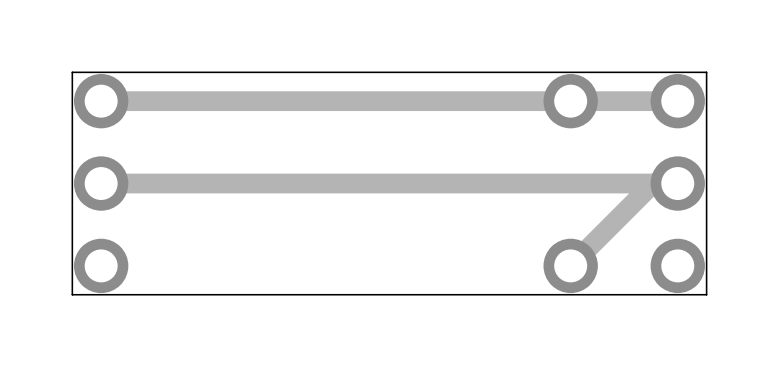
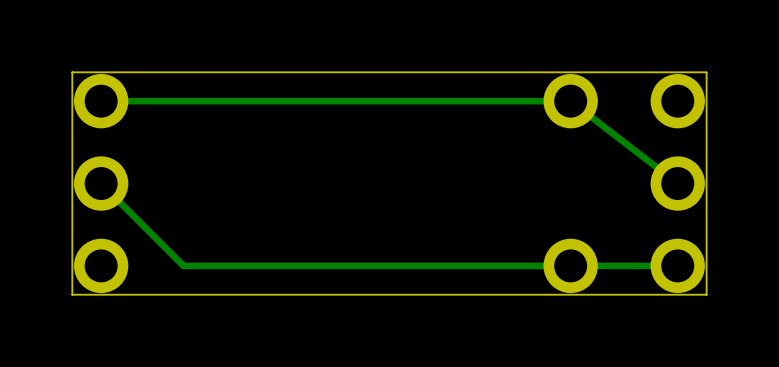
track width: thick (570, 101) (101, 101) -> thin (570, 101) (101, 101)
track: (677, 101) (570, 101) -> (677, 183) (570, 101)
track: (653, 183) (570, 265) -> none
track: (677, 183) (101, 183) -> (677, 265) (183, 265) (101, 183)

